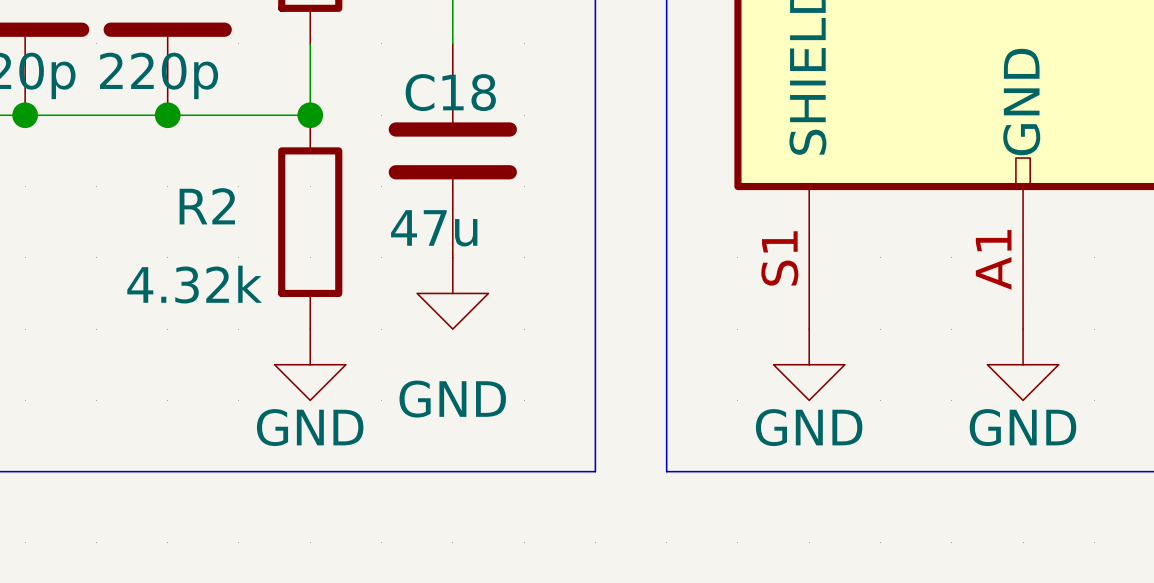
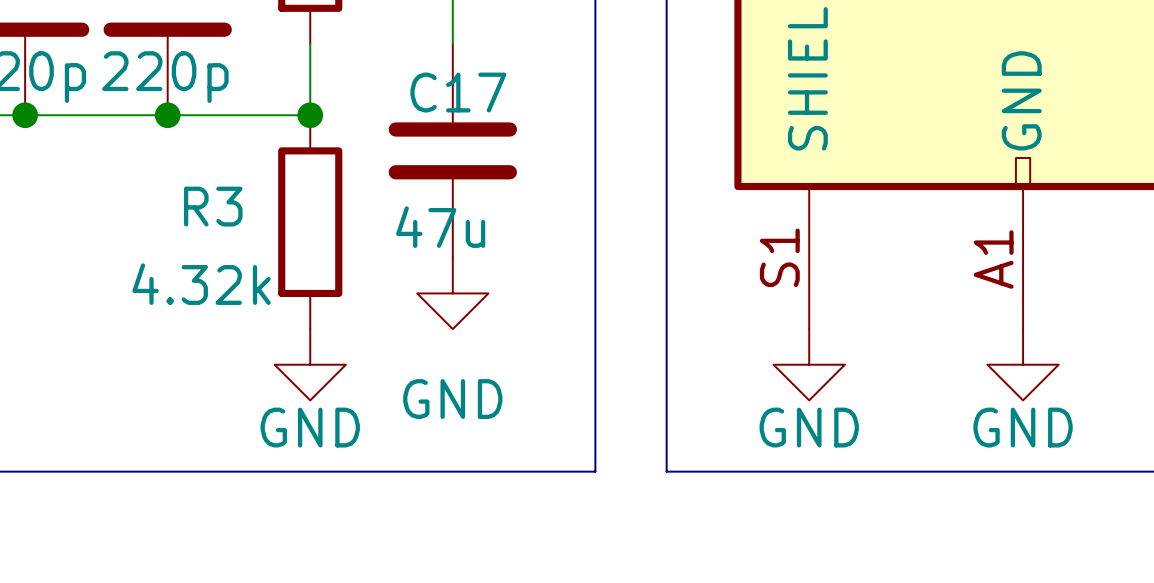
C18 name: C18 (450, 92) -> C17 (458, 92)
R2 name: R2 (207, 206) -> R3 (213, 206)

